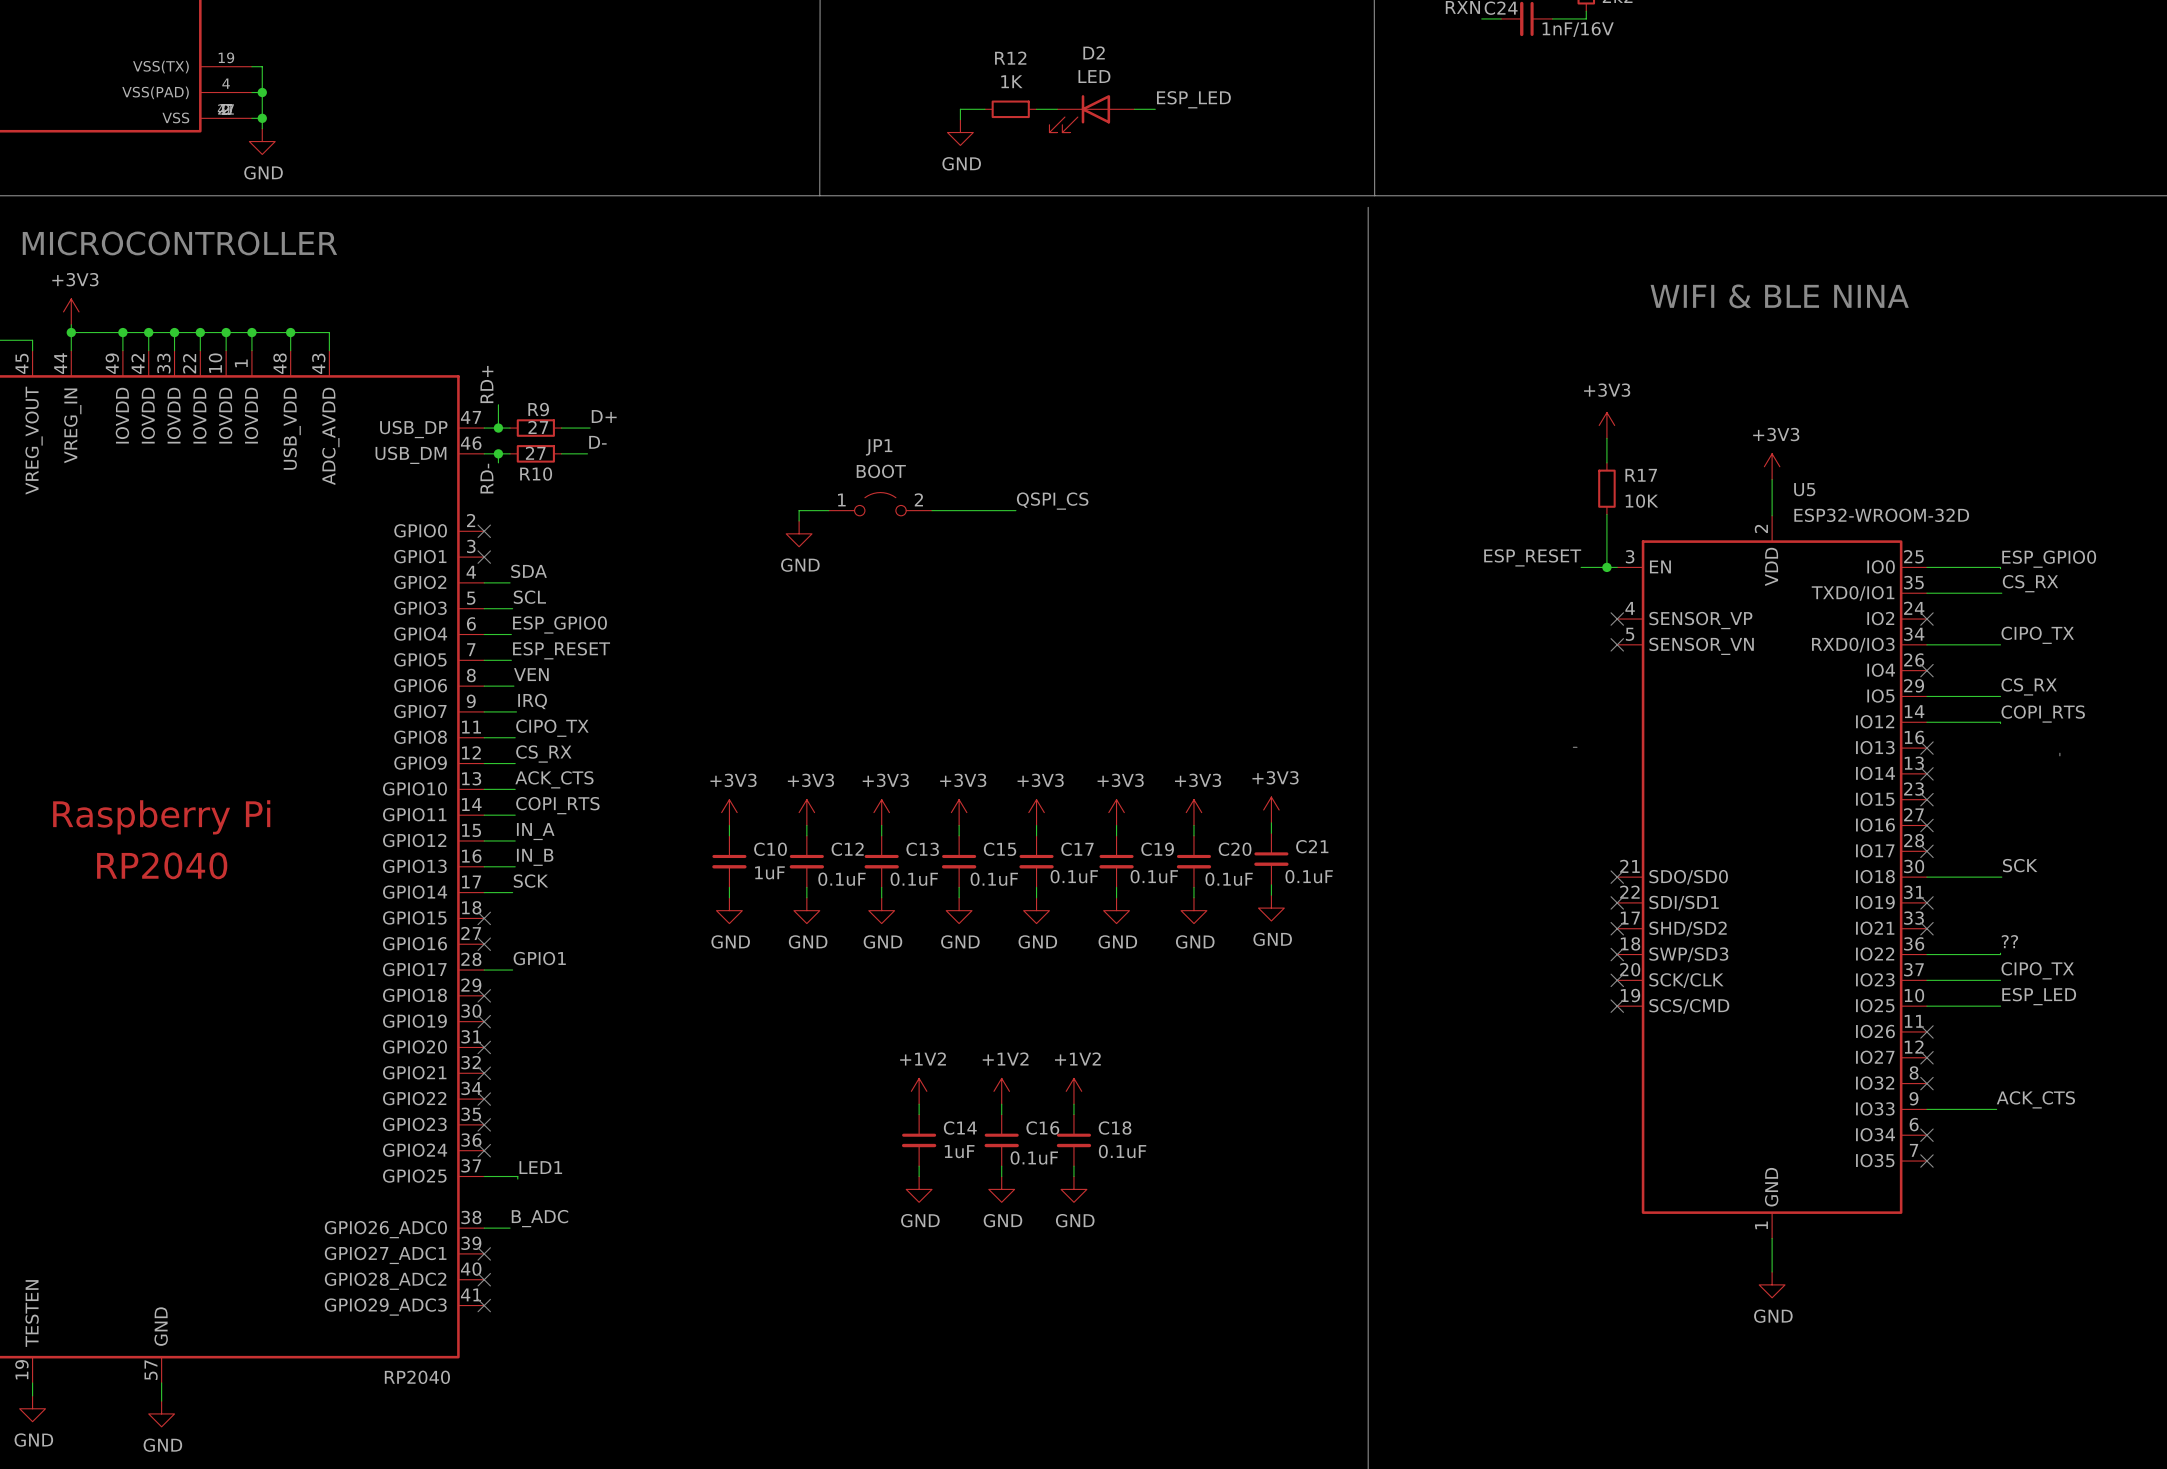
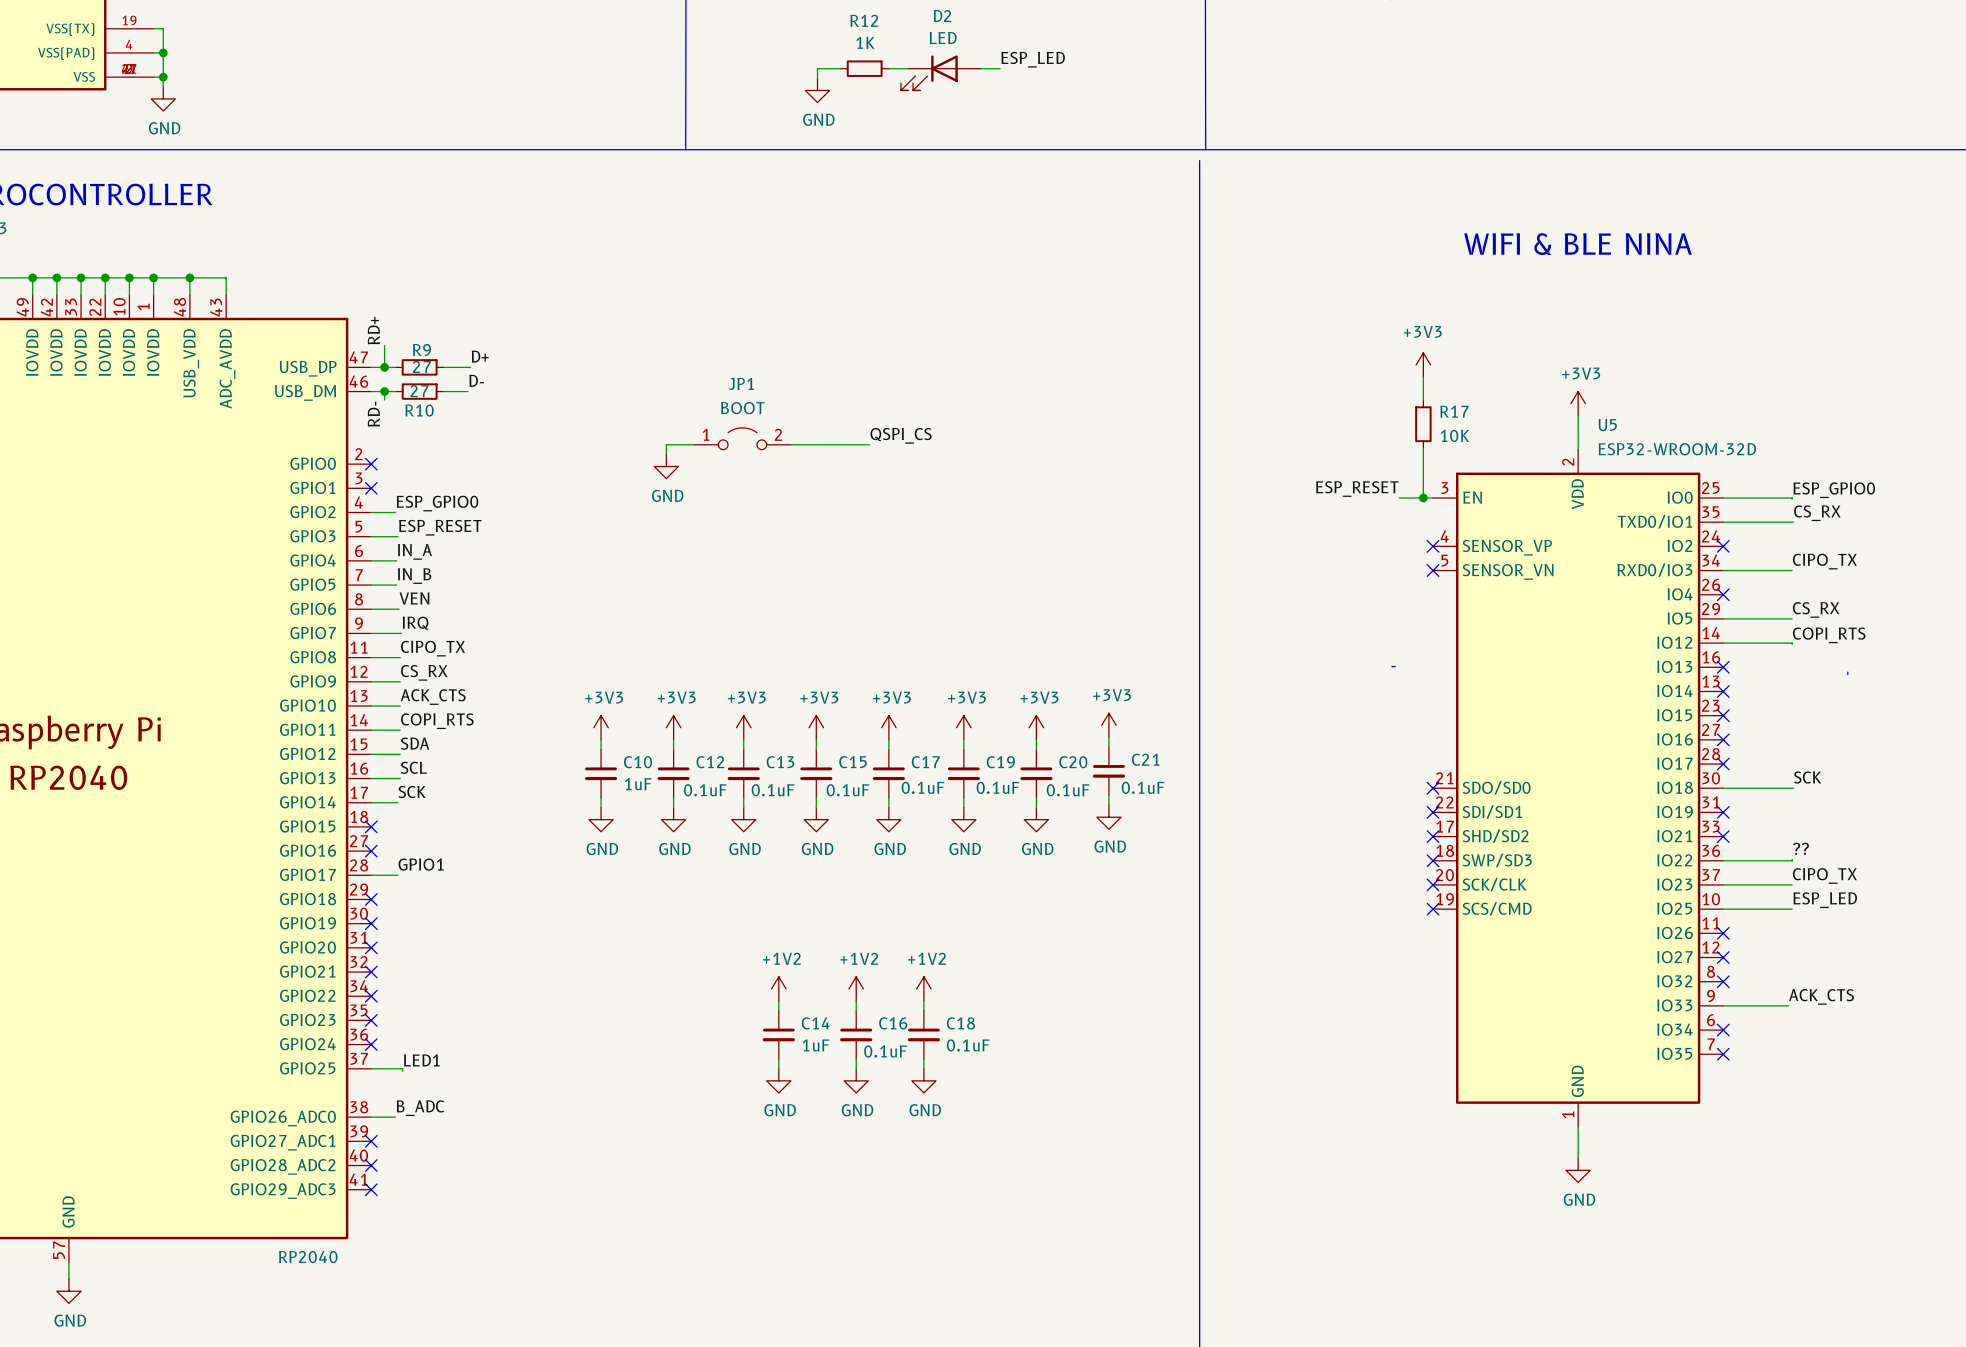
label: SDA (529, 571) -> ESP_GPIO0 (437, 503)
label: SCL (529, 597) -> ESP_RESET (440, 527)
label: ESP_GPIO0 (559, 624) -> IN_A (414, 551)
label: ESP_RESET (561, 650) -> IN_B (414, 576)
label: IN_A (535, 831) -> SDA (415, 743)
label: IN_B (535, 857) -> SCL (413, 767)

